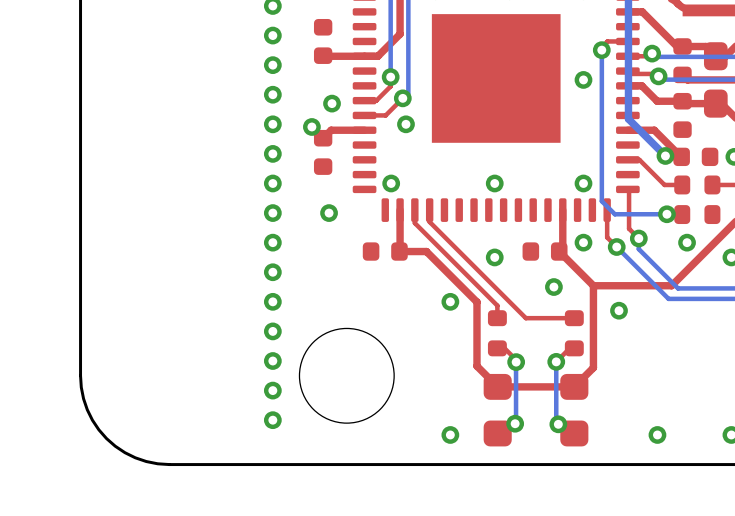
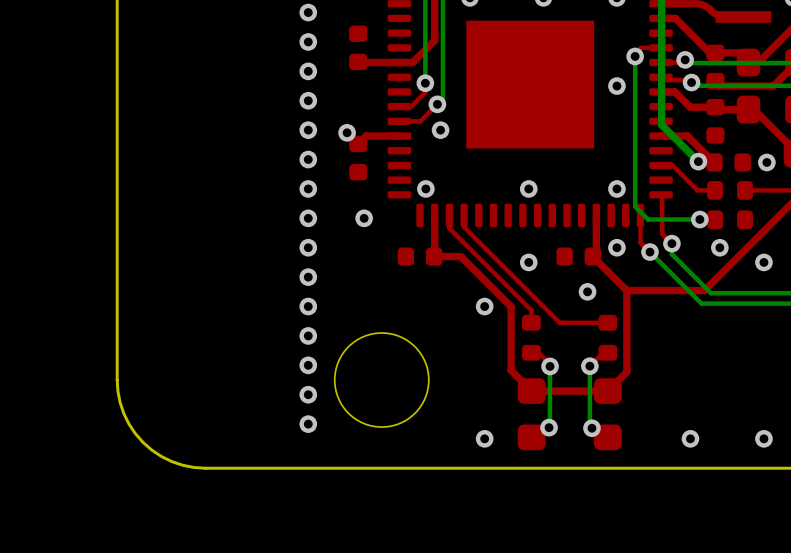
via: (332, 103) -> none
via: (619, 310) -> none

